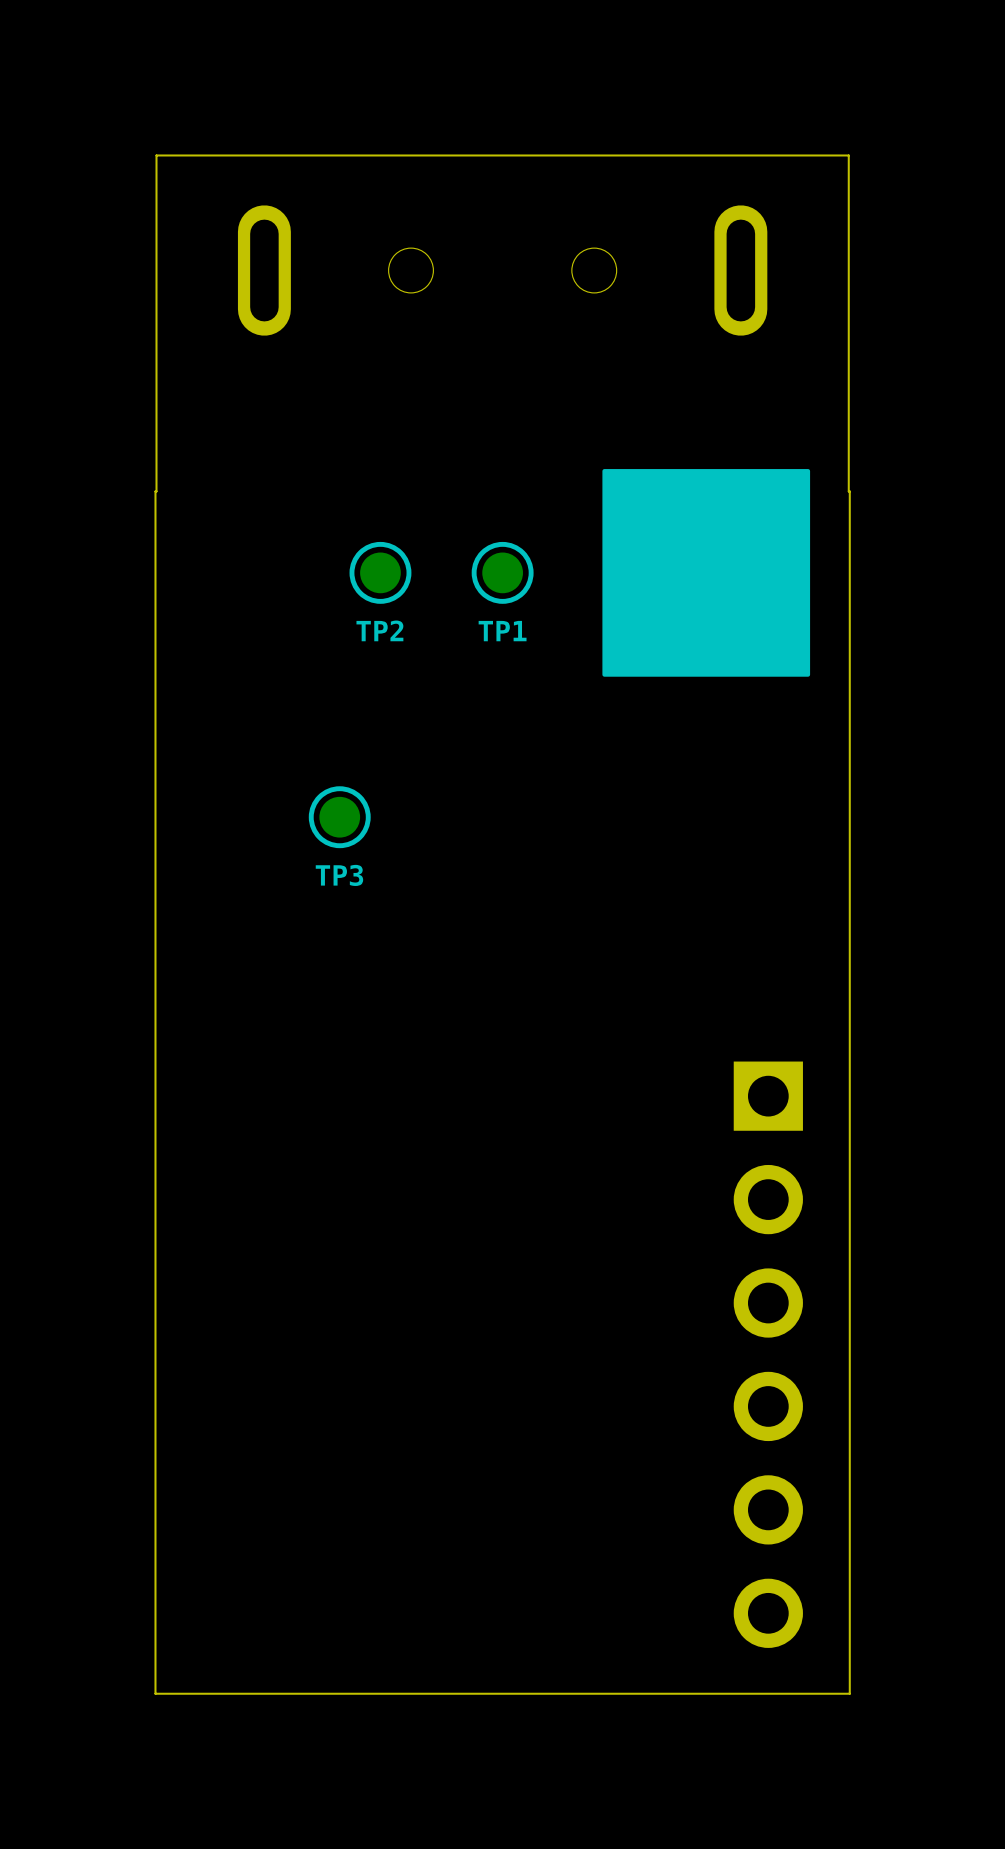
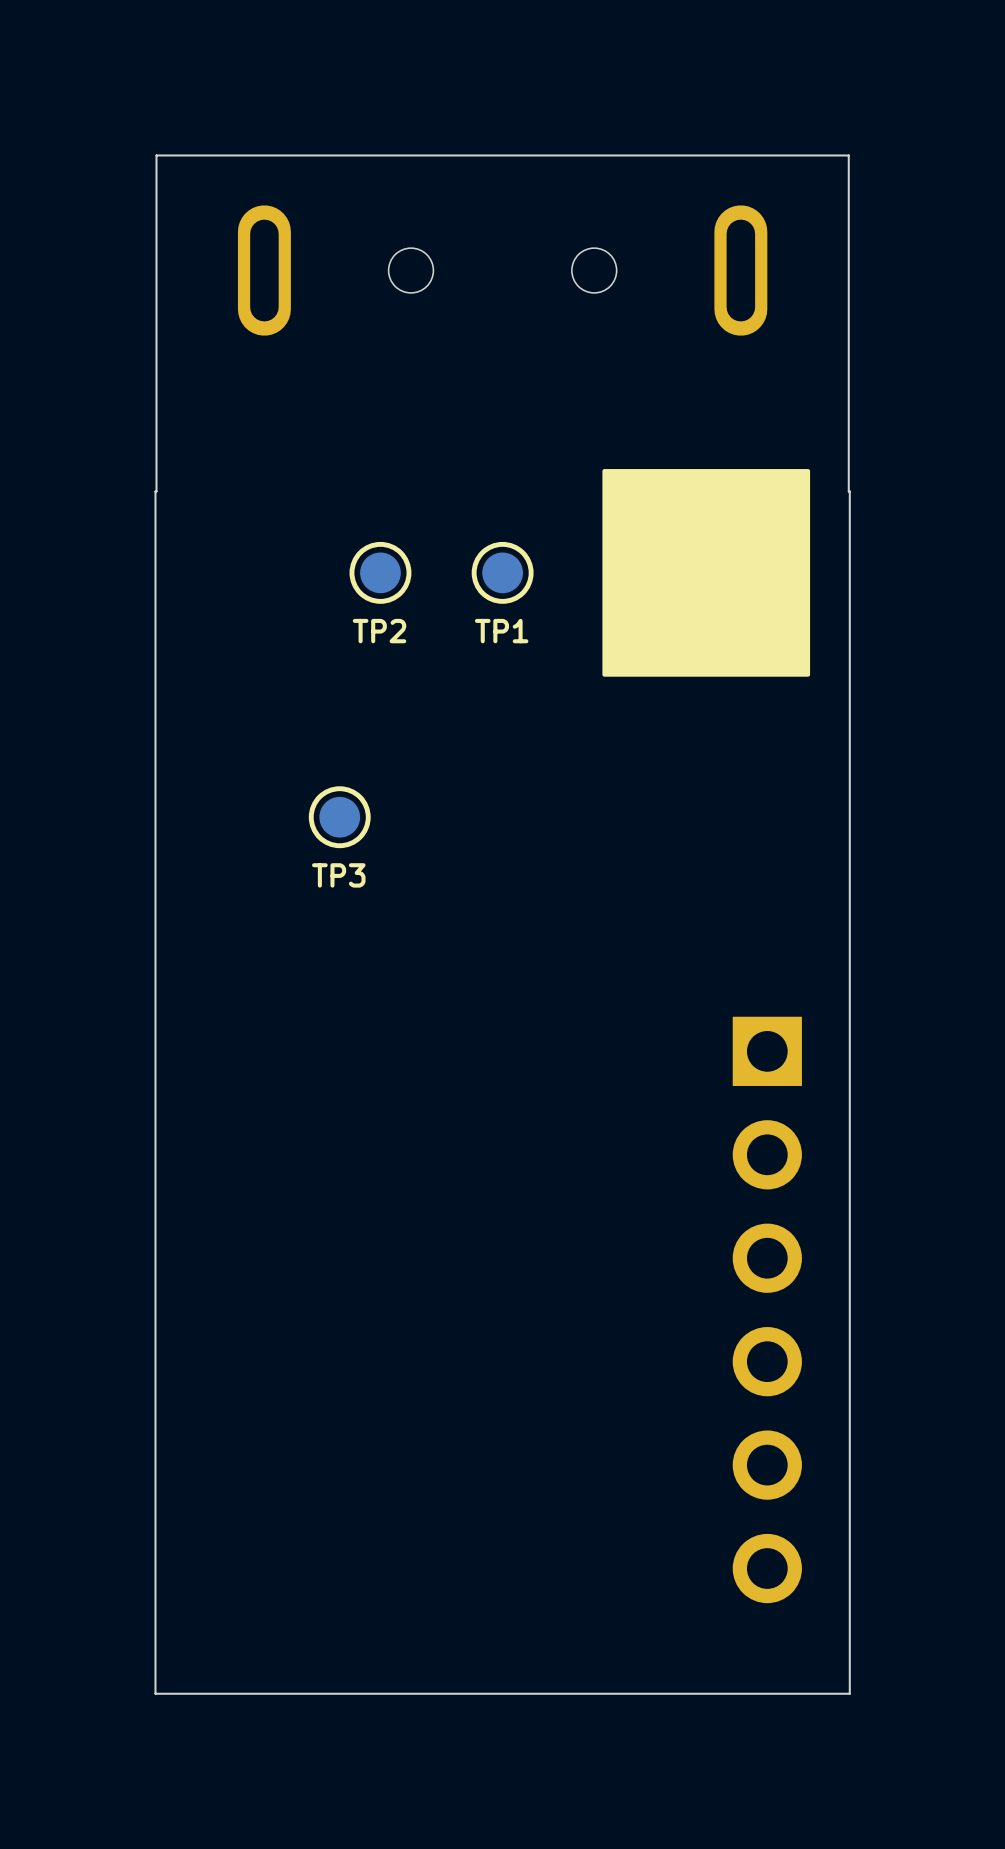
part position: (768, 1354) -> (767, 1309)

